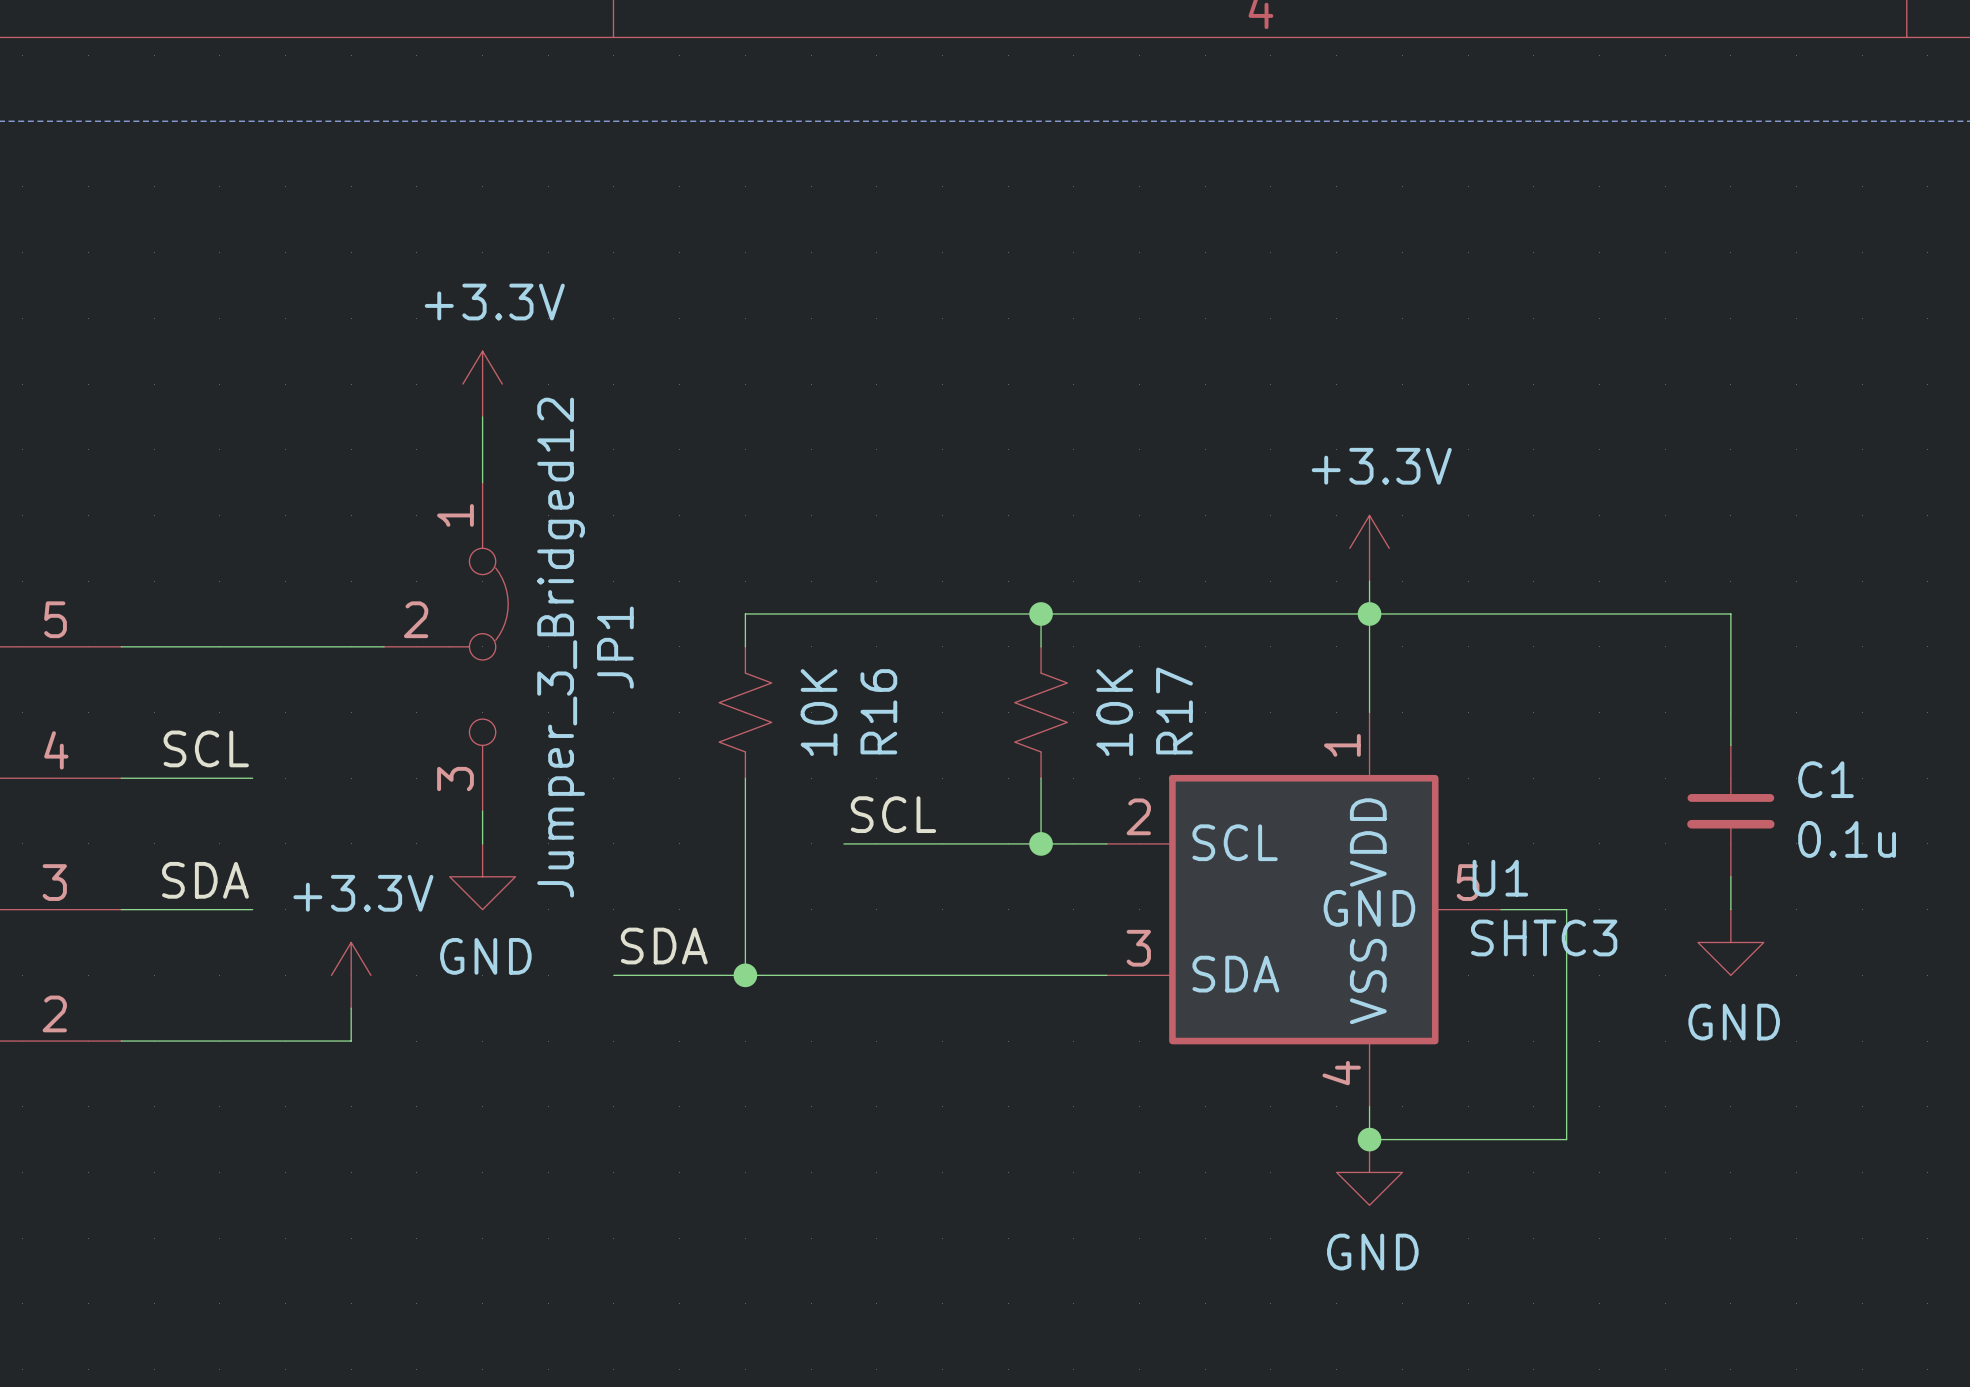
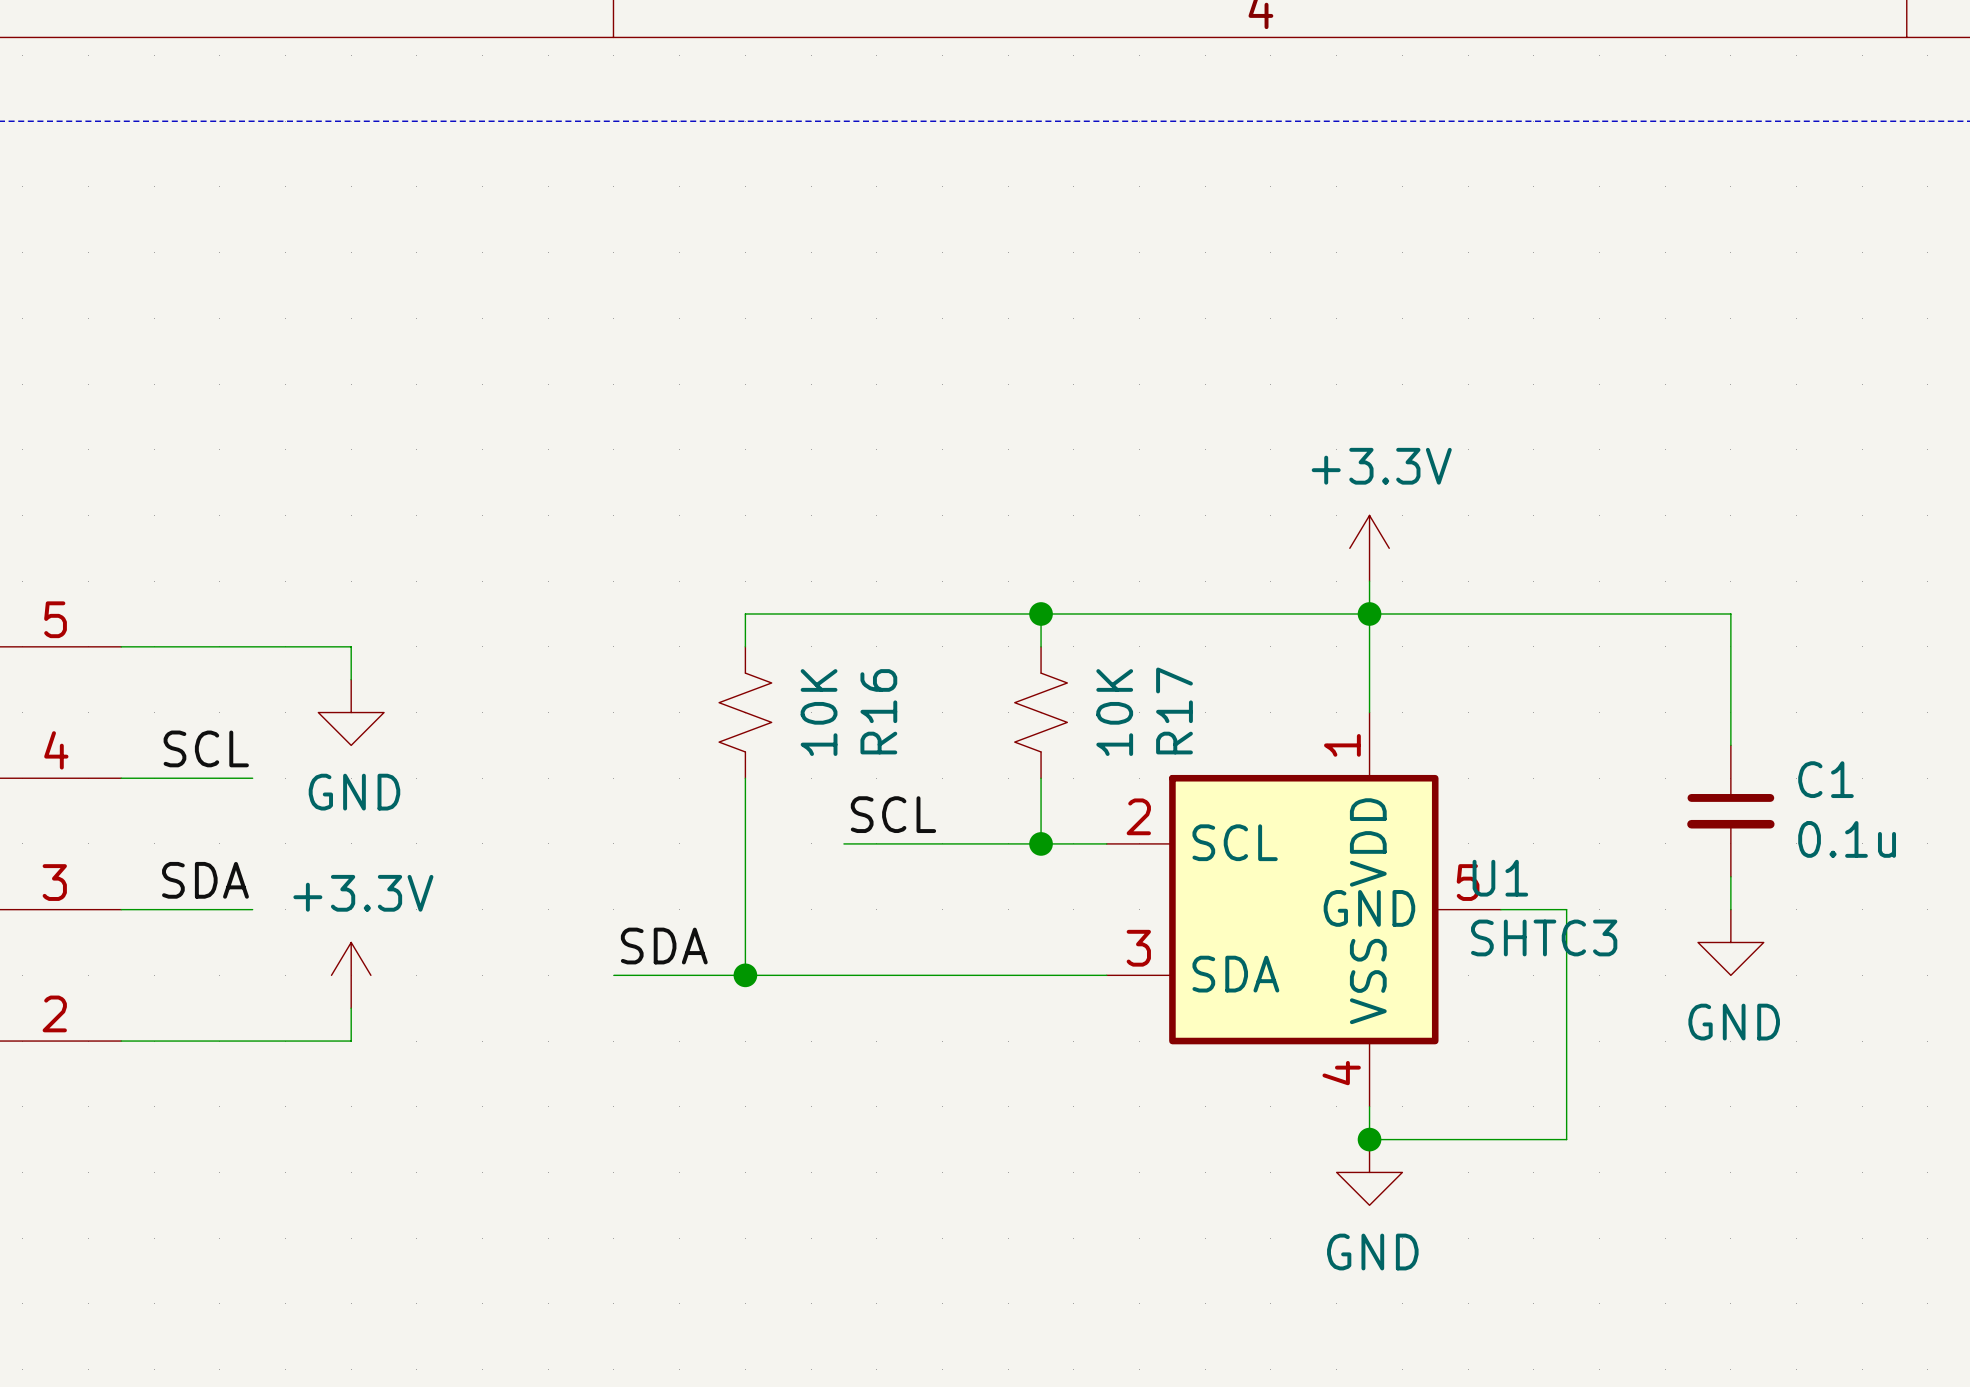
power symbol: +3.3V (482, 384) -> none
wire: (482, 416) (482, 482) -> none
wire: (351, 646) (384, 646) -> (351, 646) (351, 679)
JP1: Jumper_3_Bridged12 (446, 646) -> none
wire: (482, 811) (482, 843) -> none
power symbol position: GND (482, 876) -> GND (351, 712)

